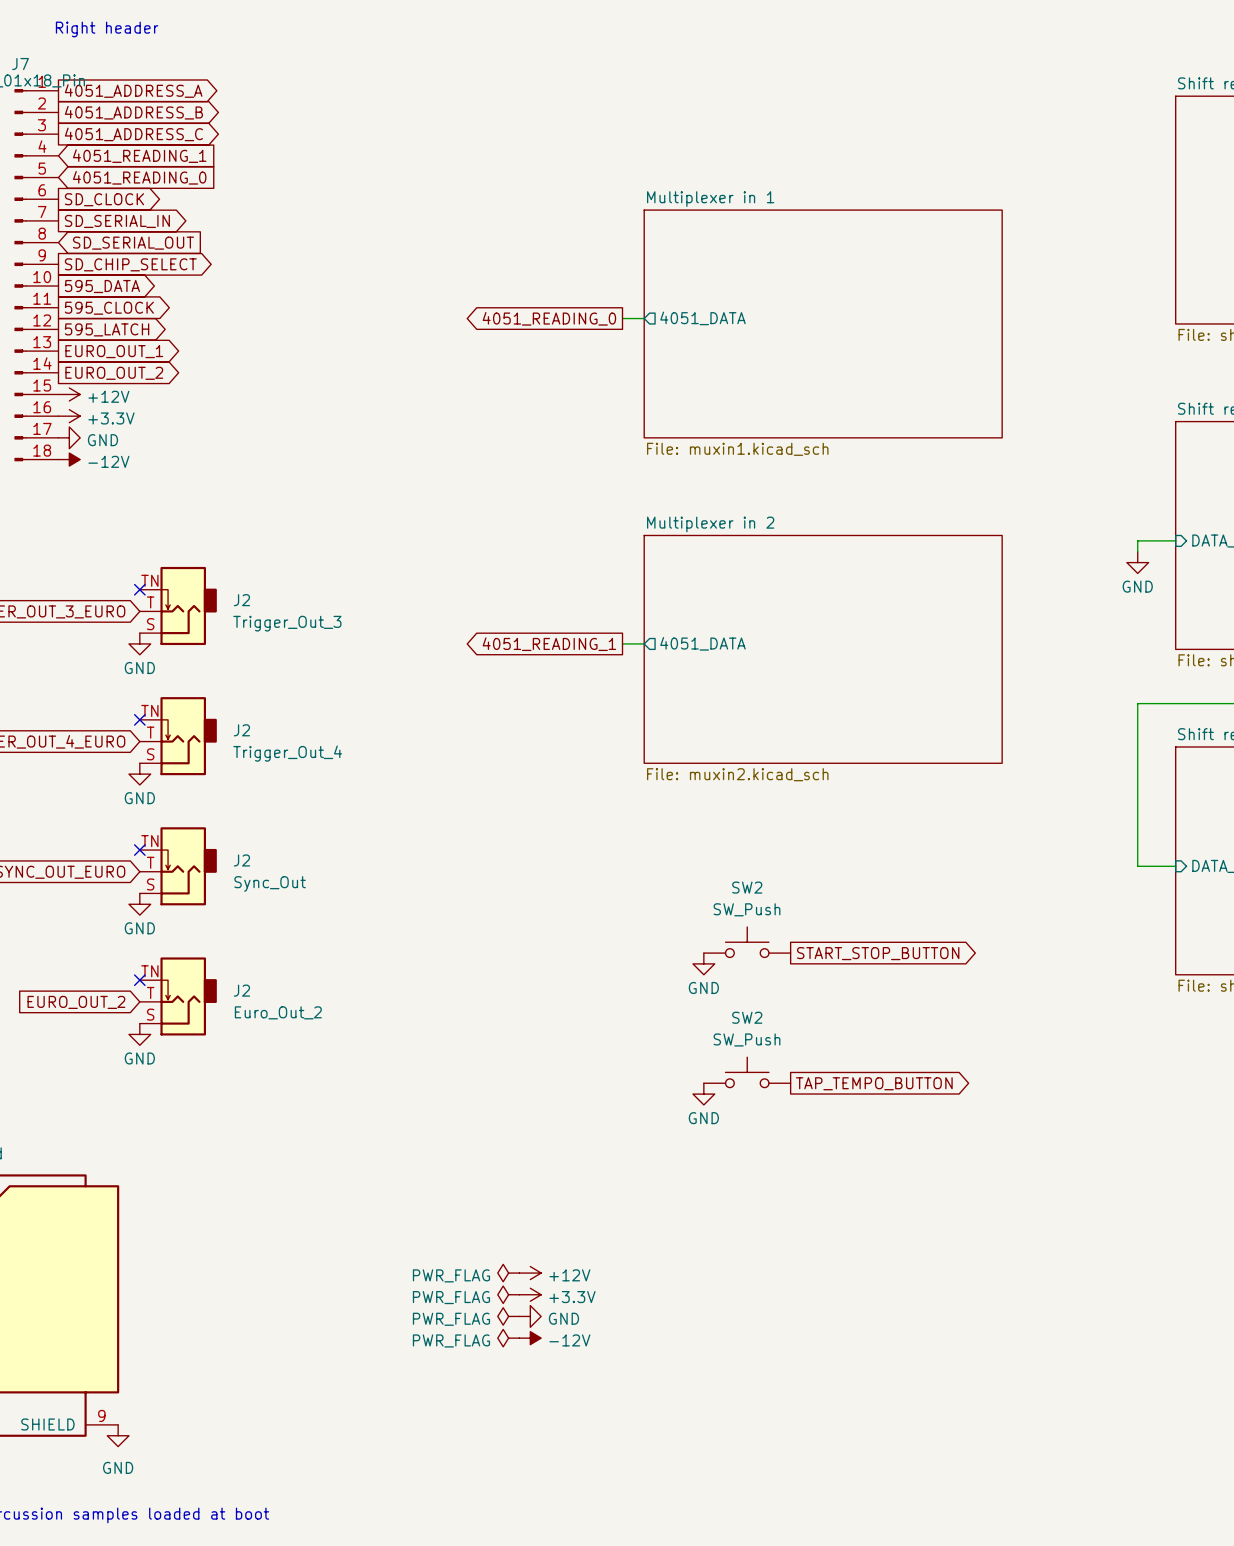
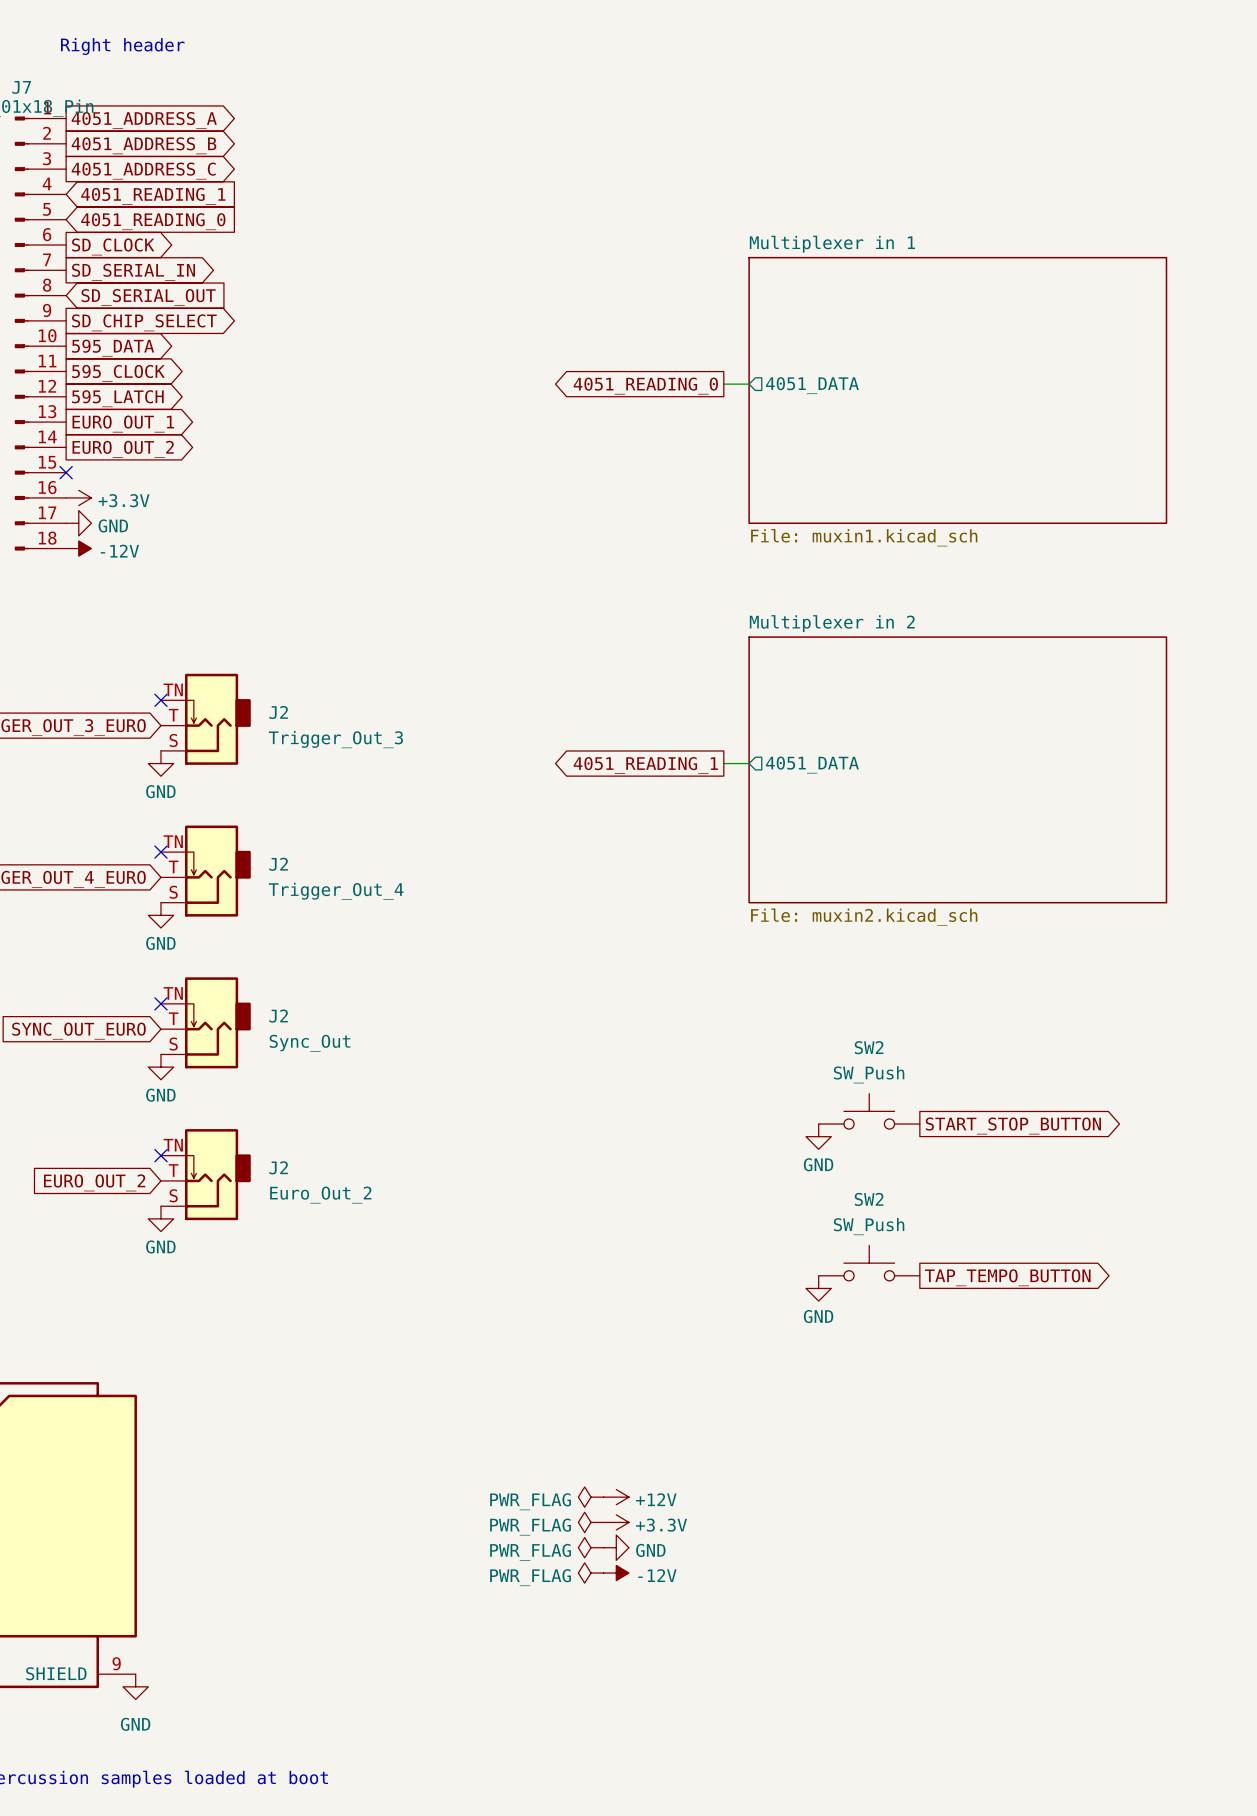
no-connect mark: none -> (66, 472)
power symbol: +12V (69, 394) -> none

